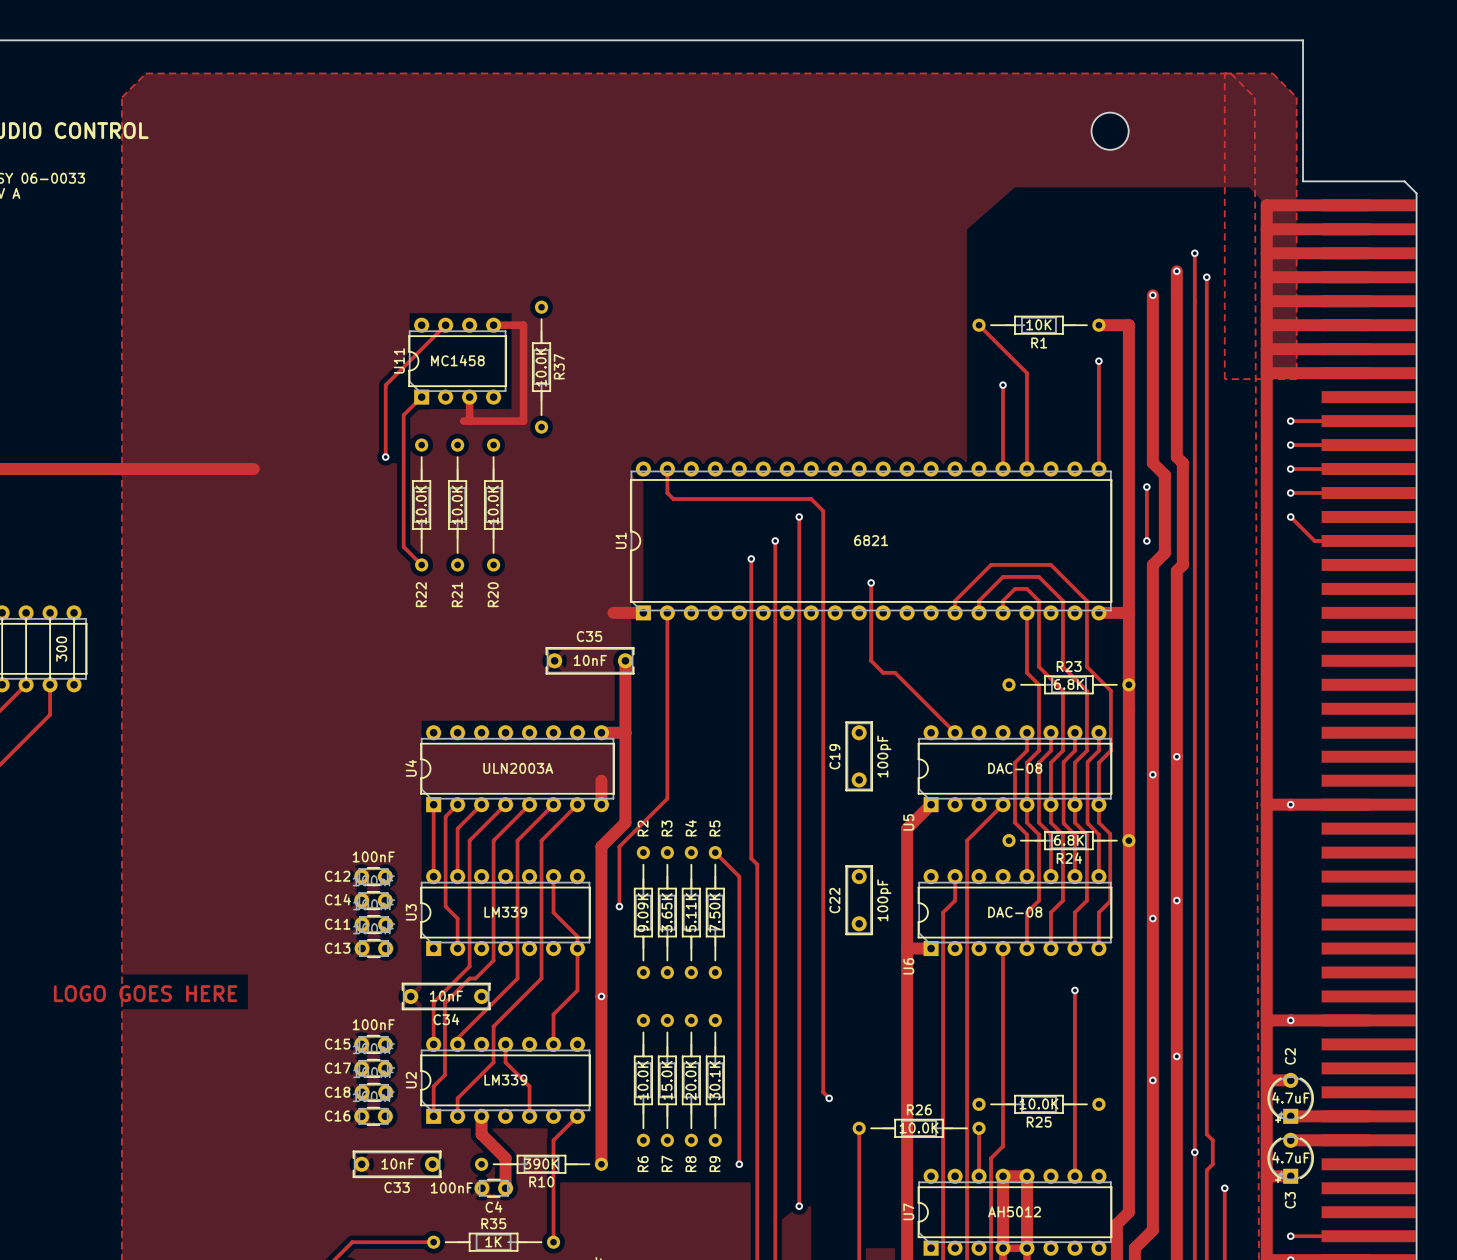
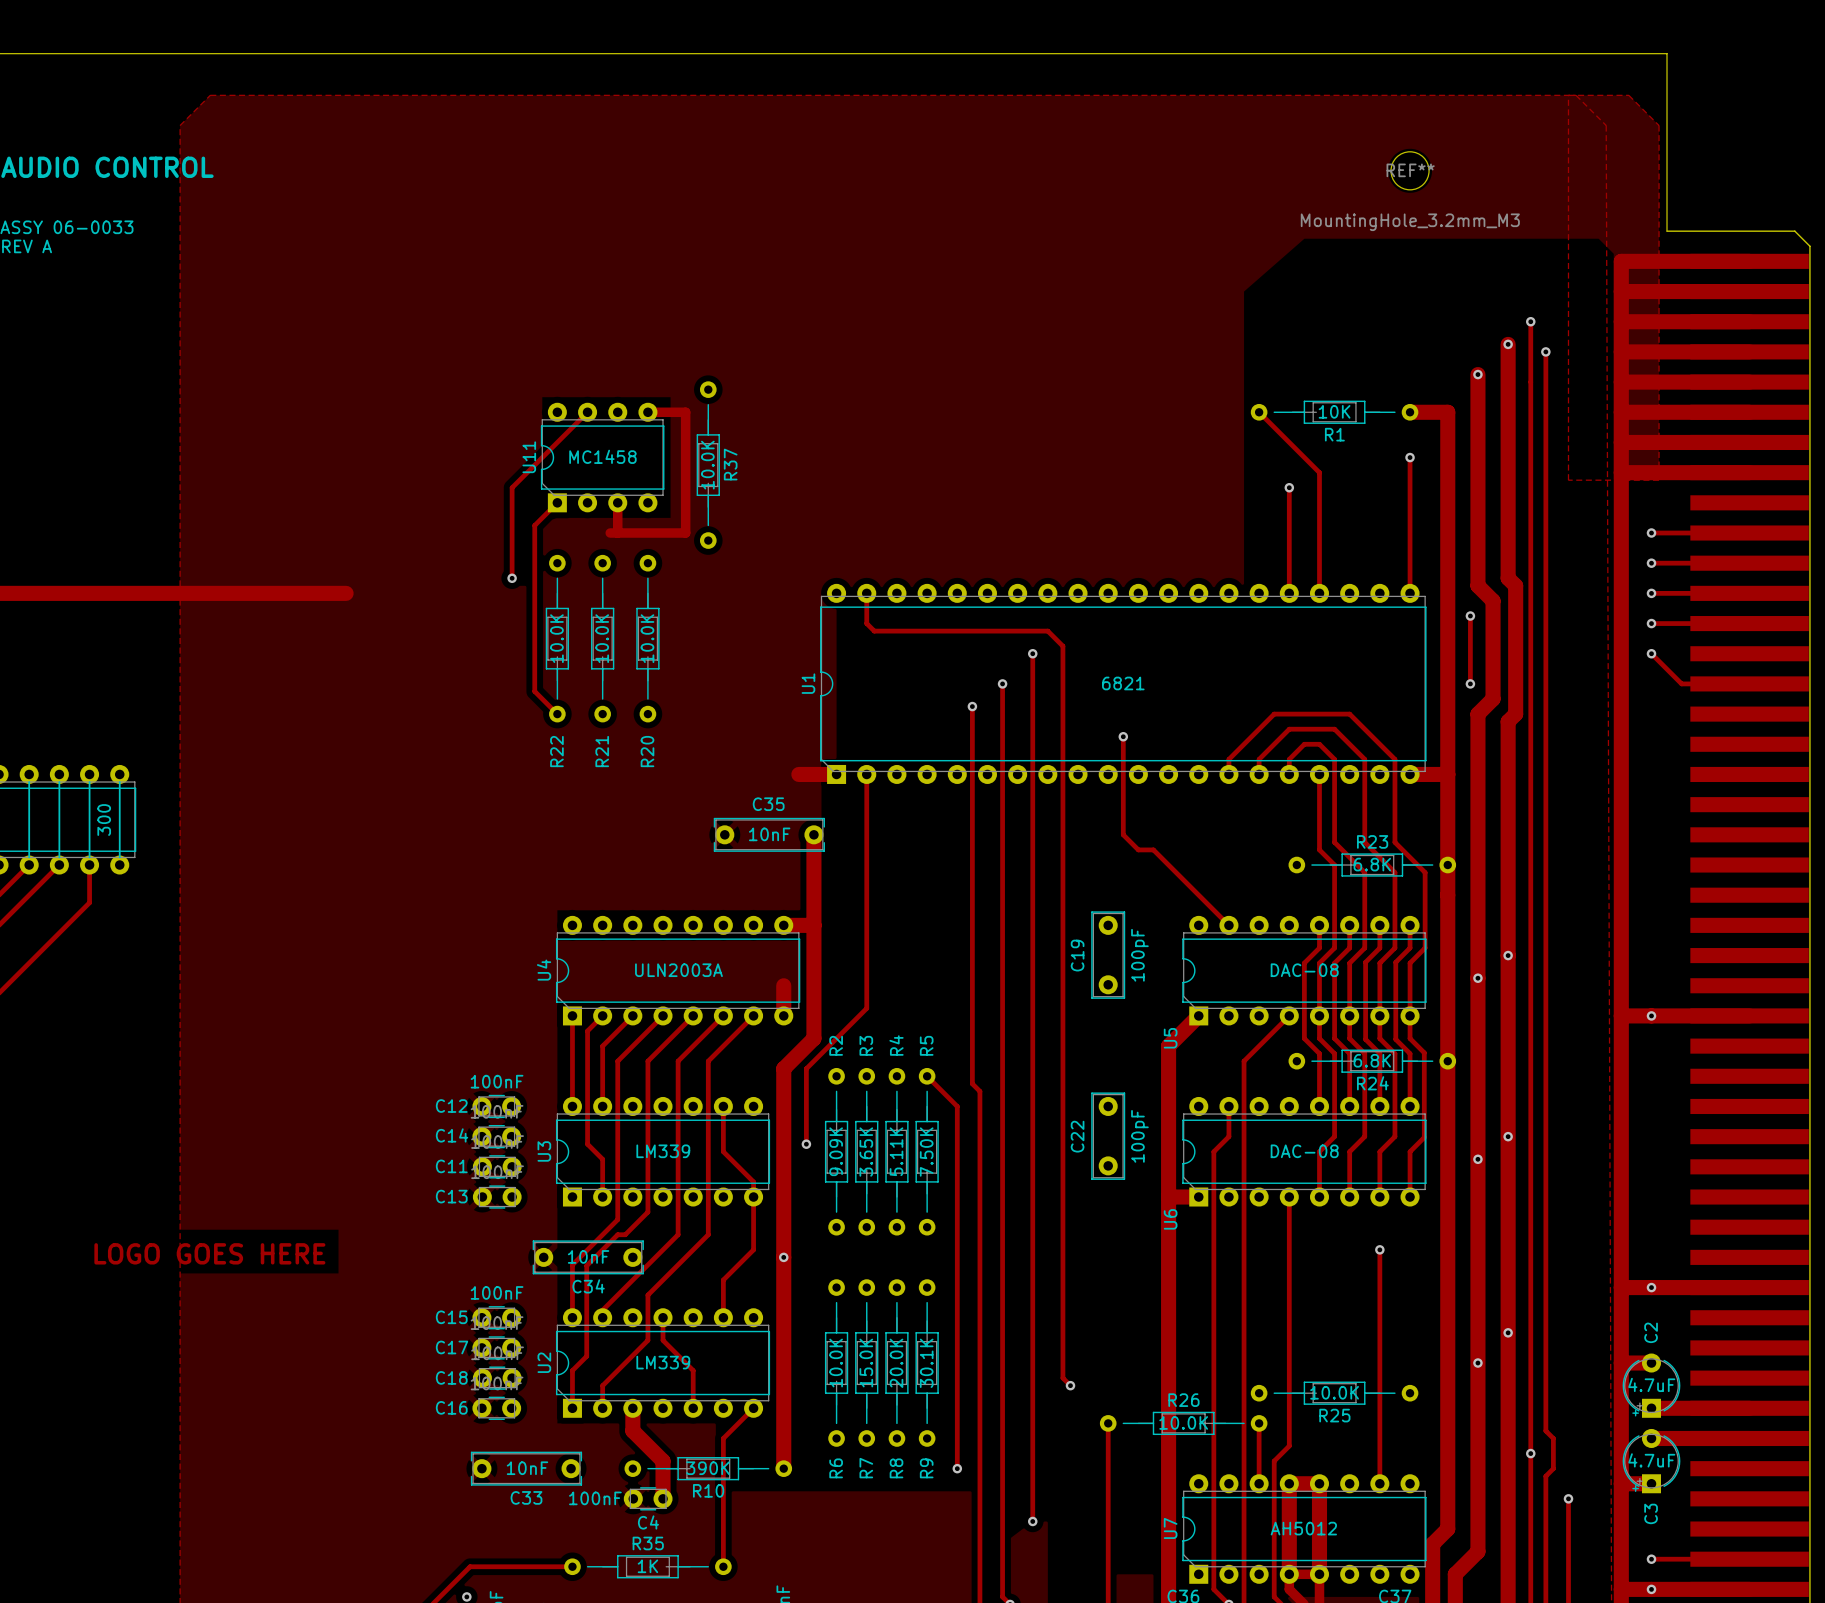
round board edge: [1091, 112, 1130, 151] -> none
REF**: none -> MountingHole_3.2mm_M3 (1410, 170)

